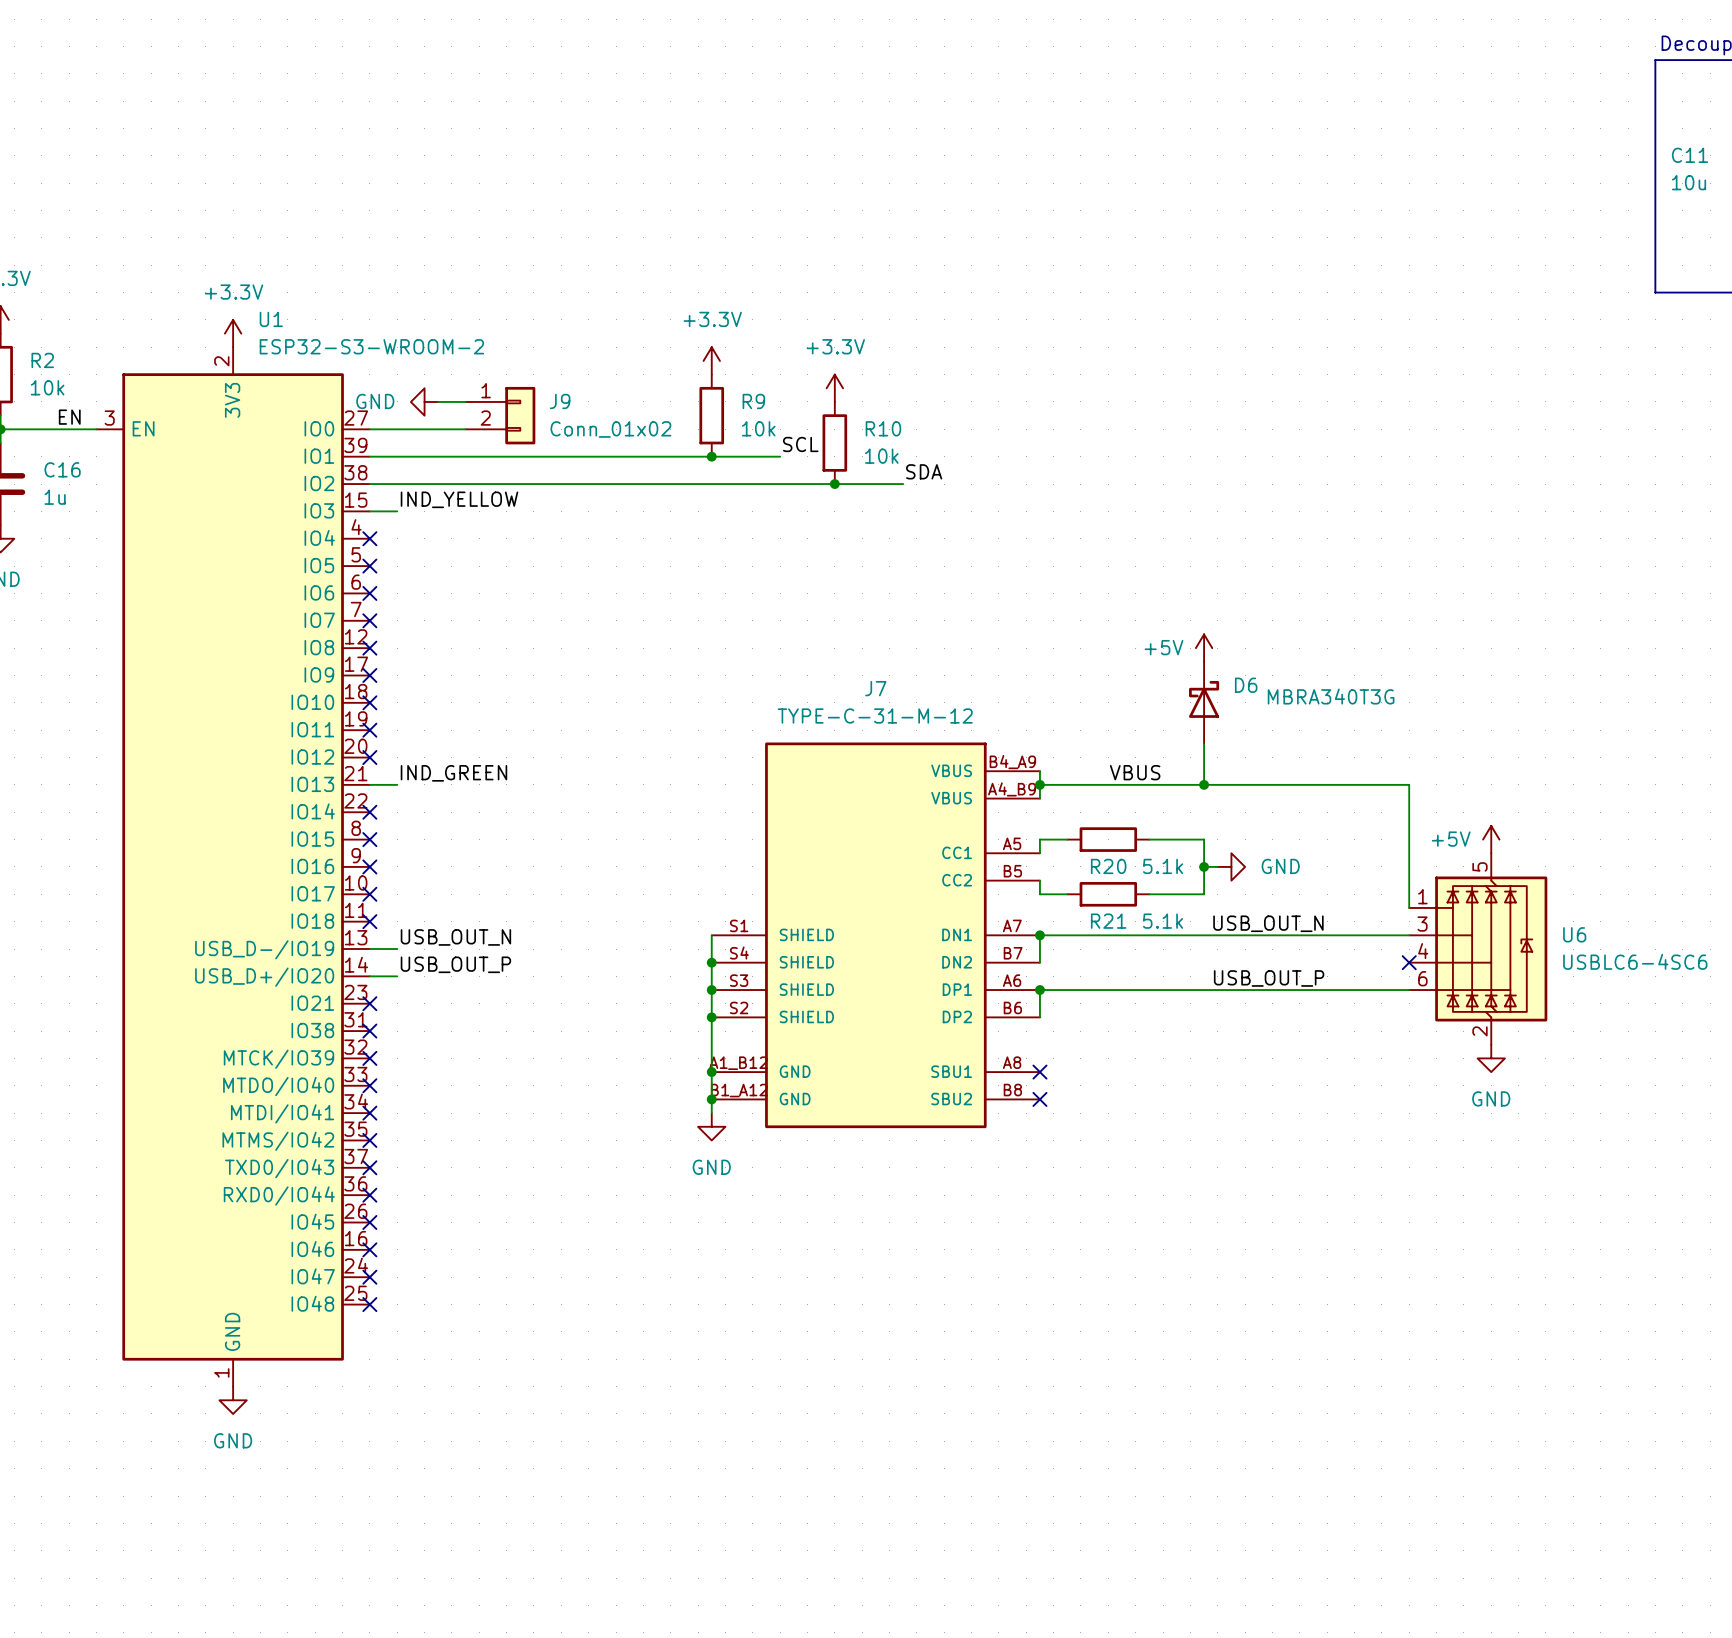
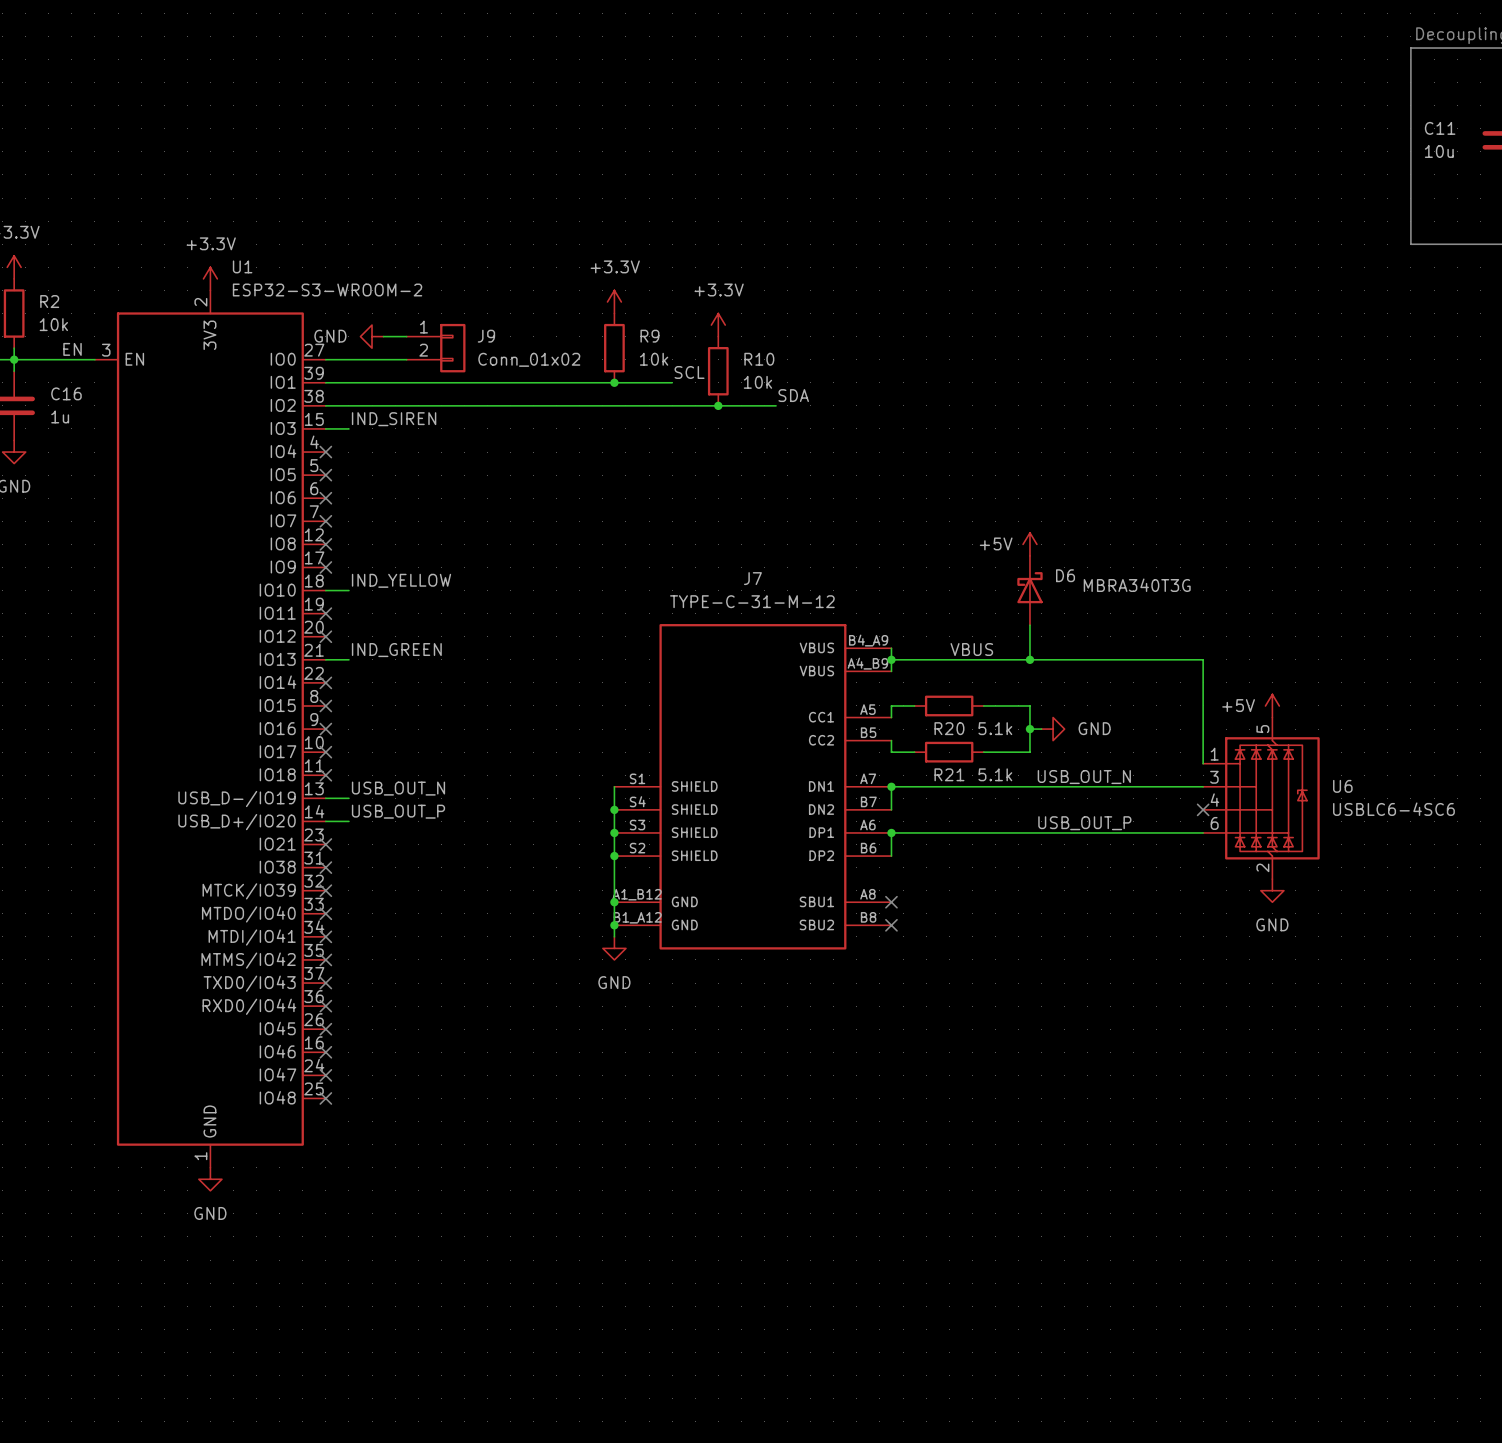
label: IND_YELLOW (459, 499) -> IND_SIREN (394, 419)
label: none -> IND_YELLOW (401, 580)
wire: none -> (325, 590) (348, 590)
no-connect mark: (369, 702) -> none

